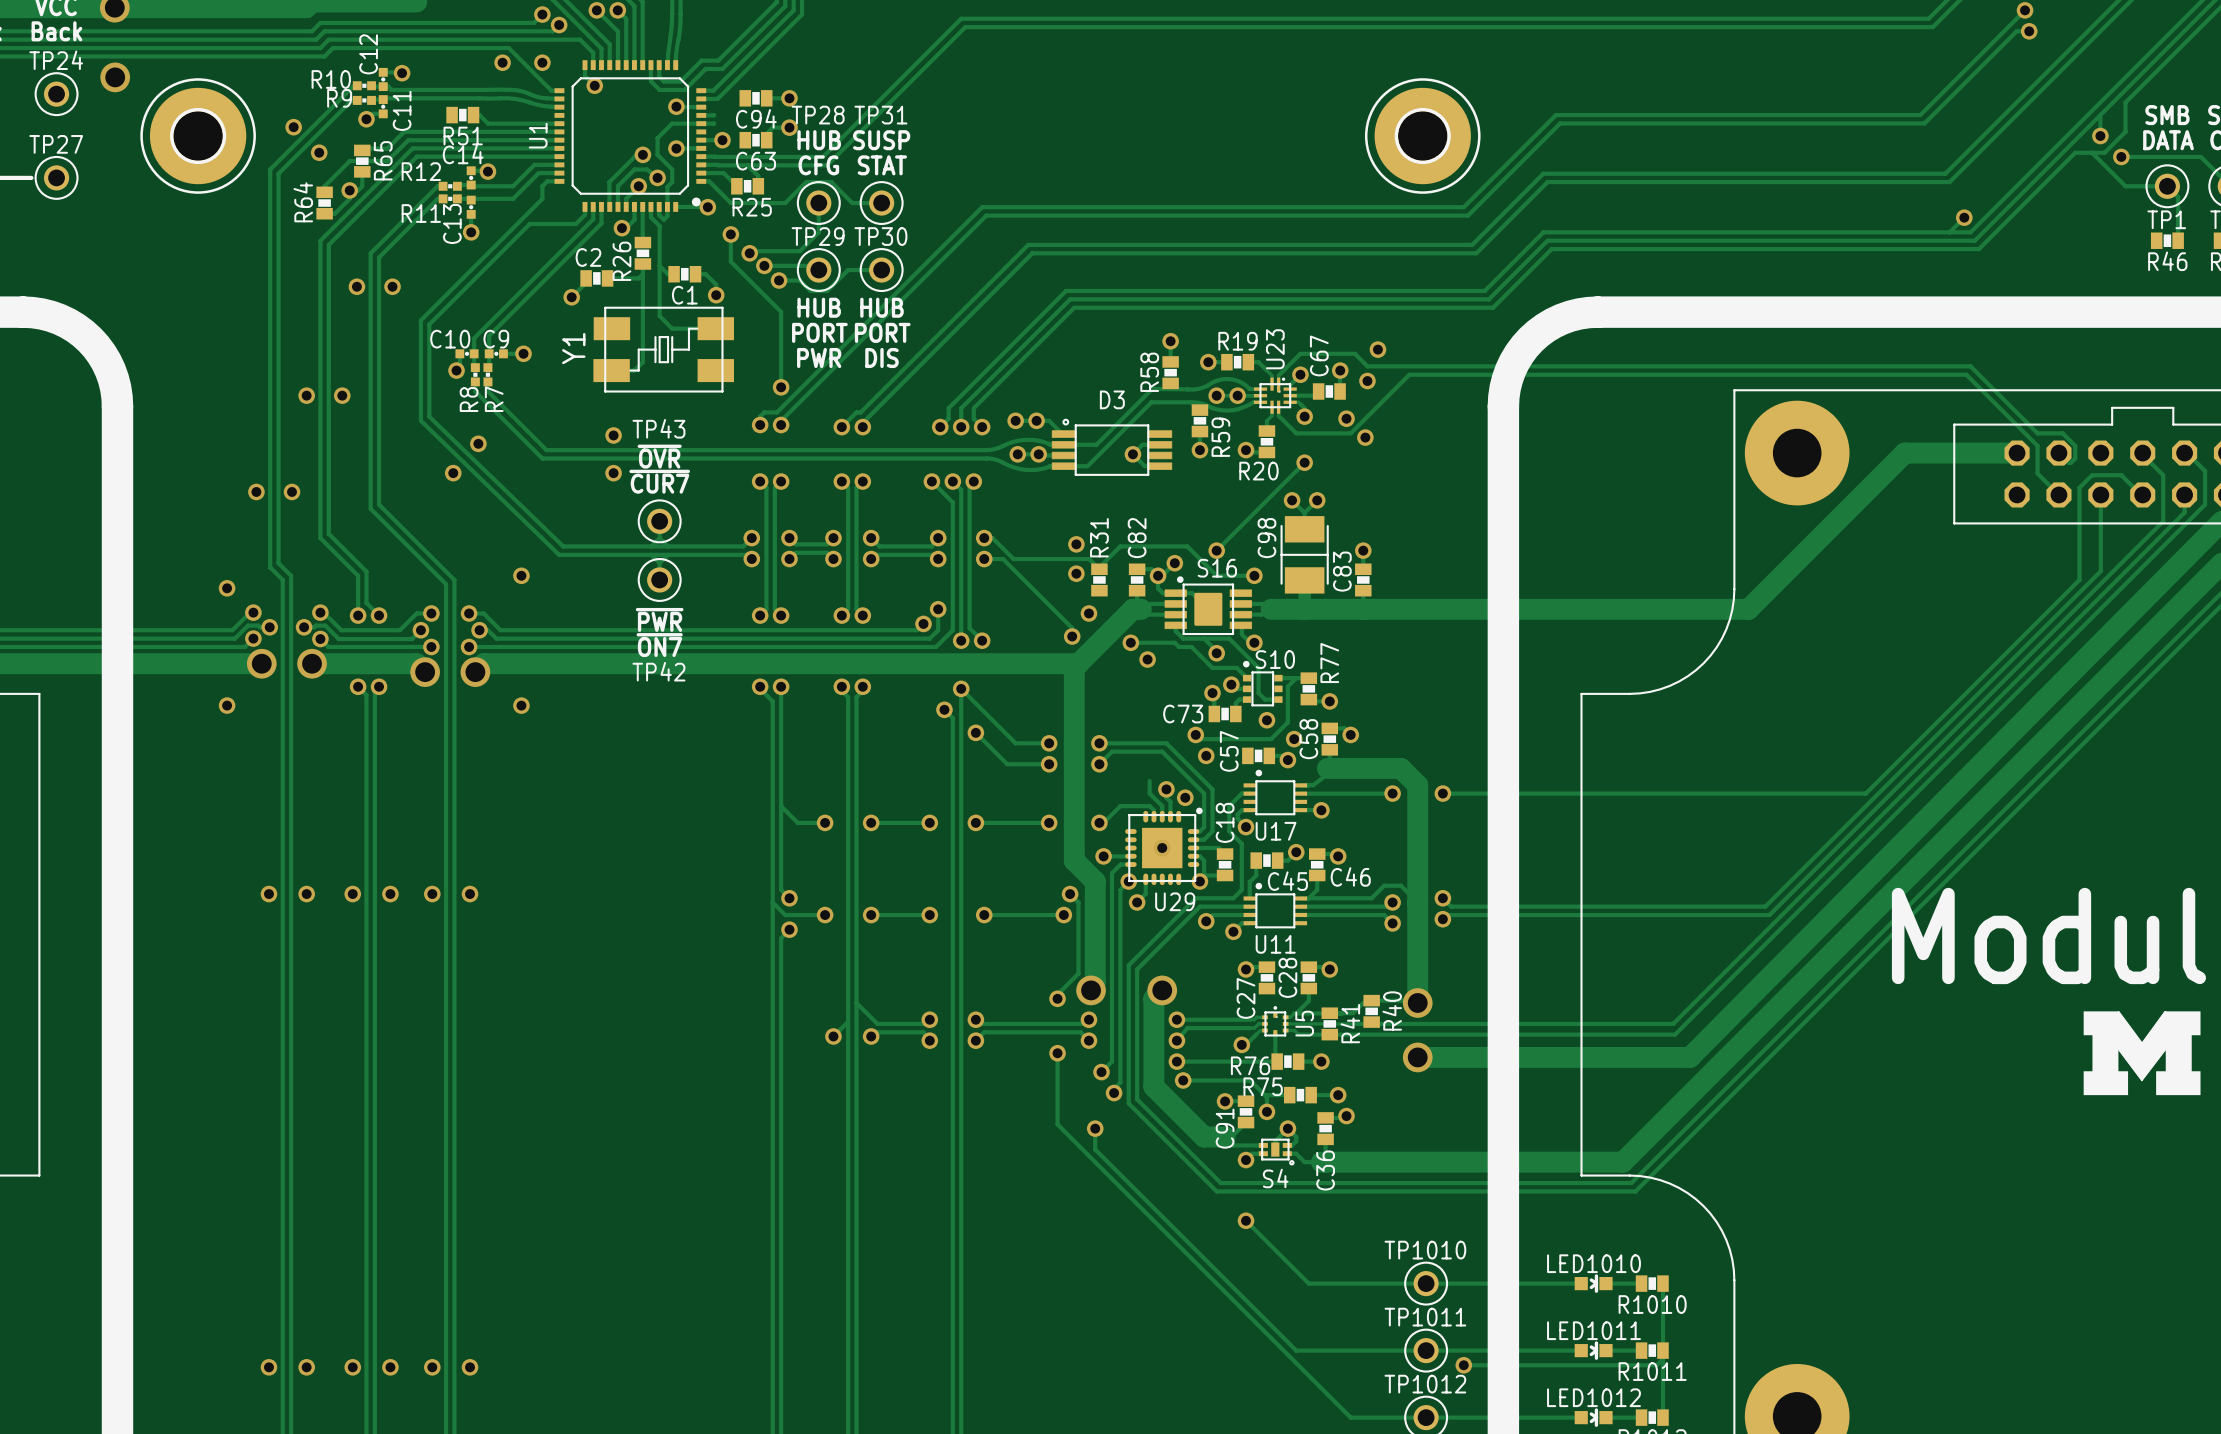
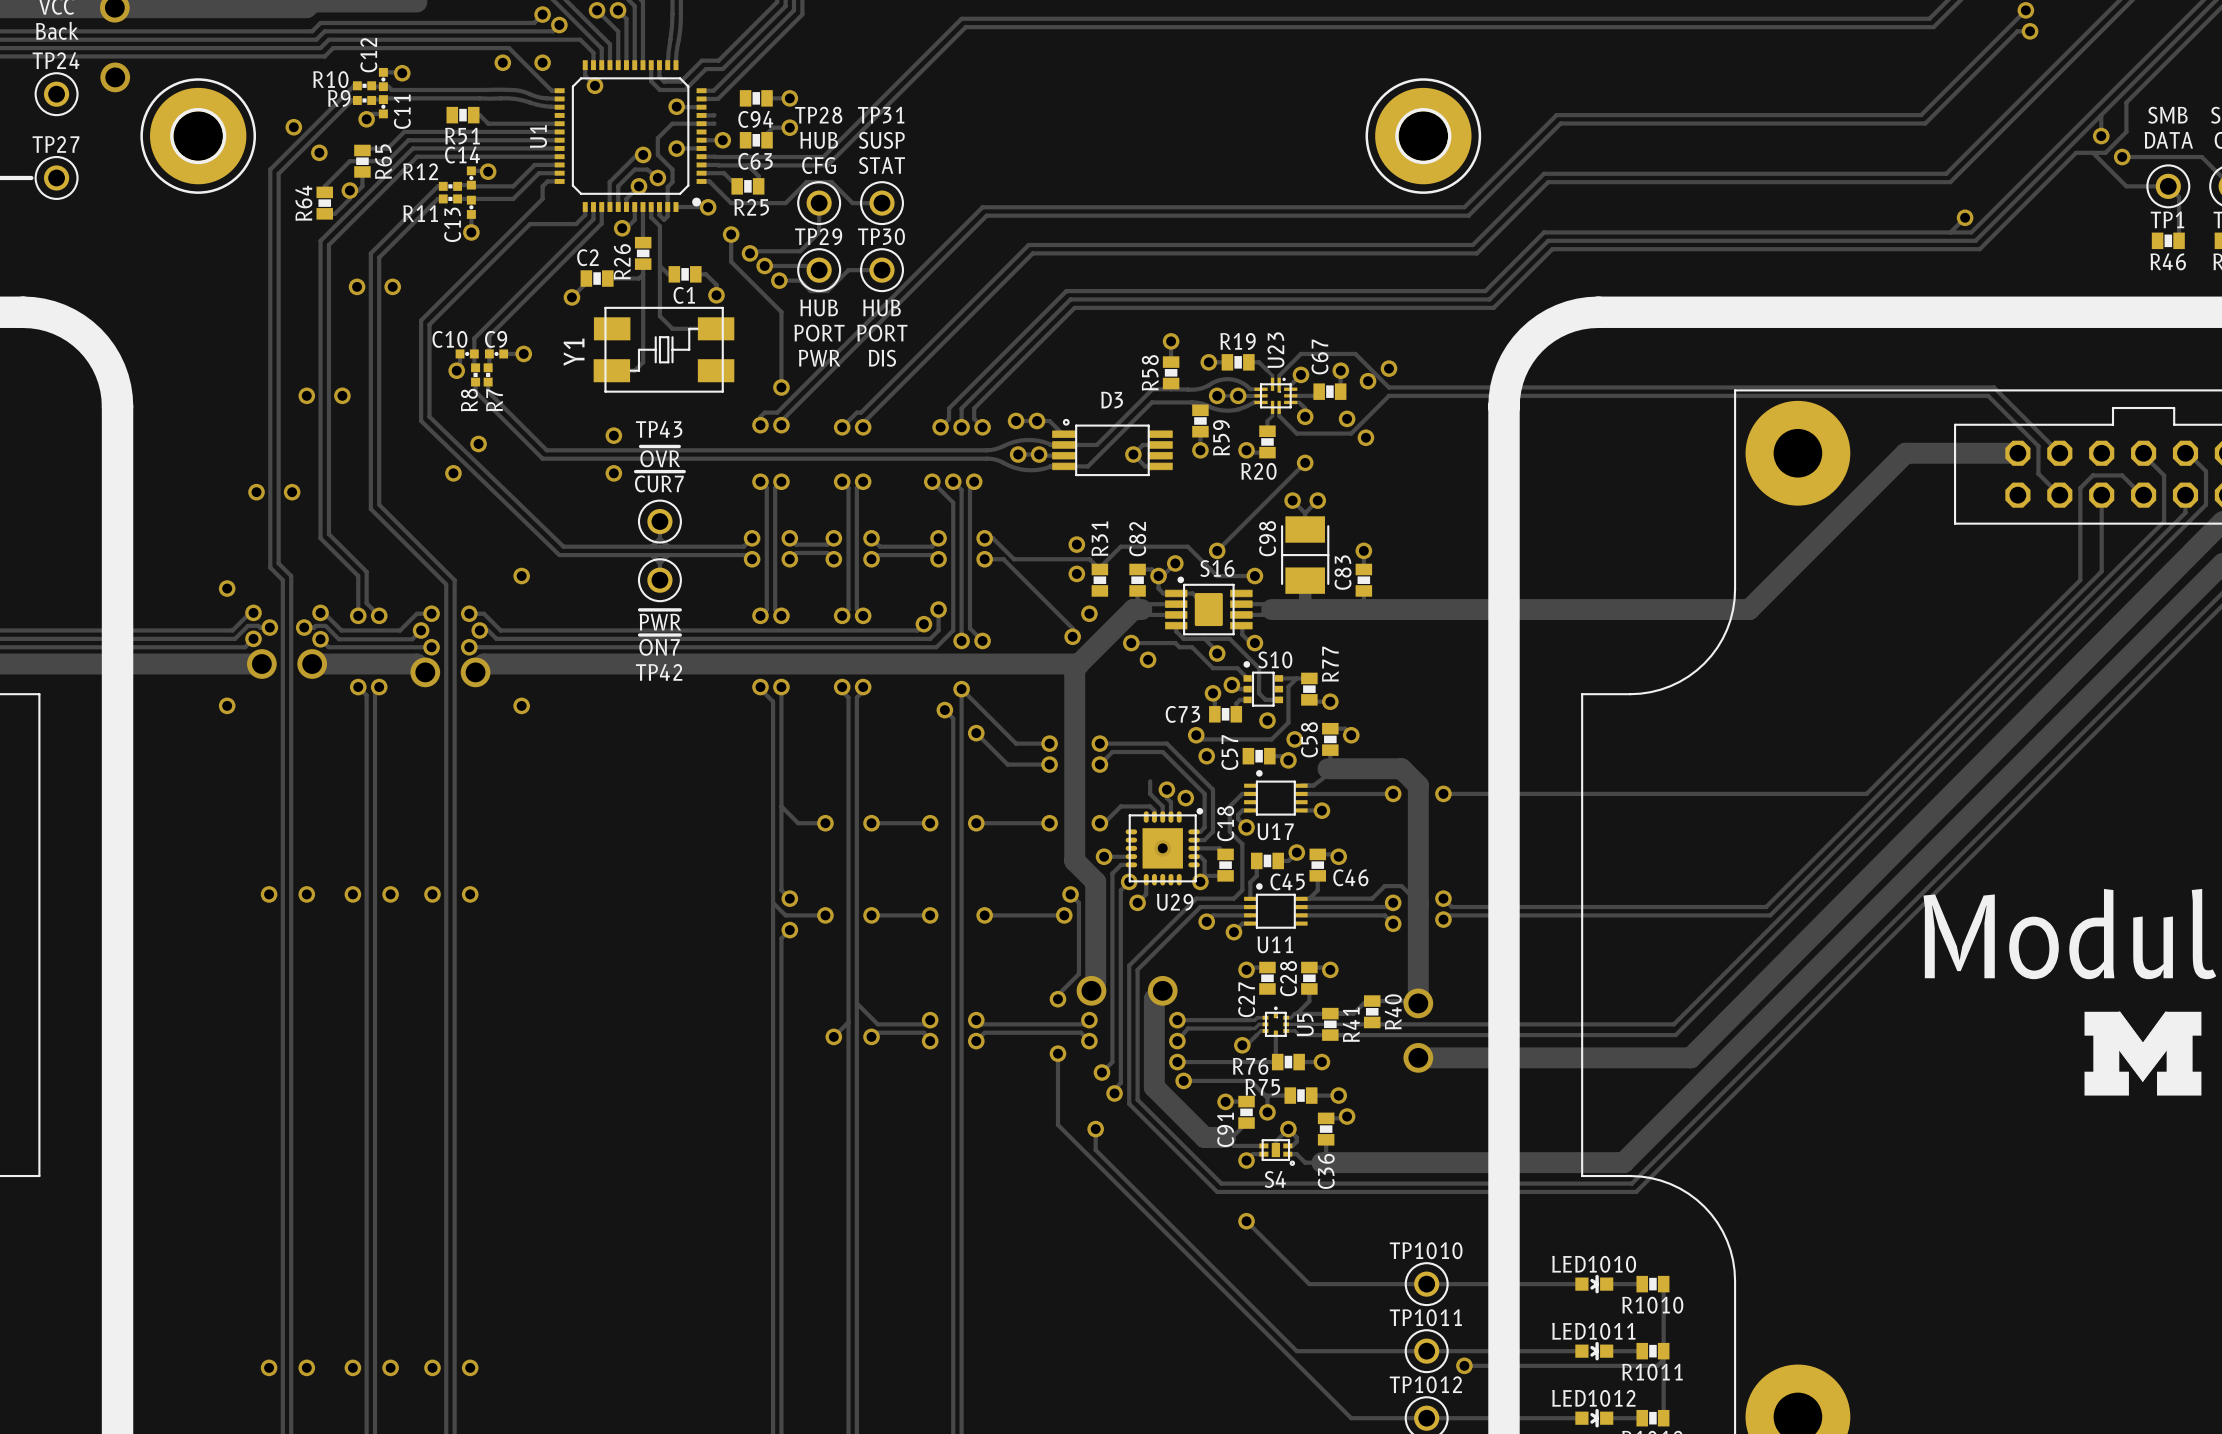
via position: (1377, 349) -> (1388, 368)
track: (1367, 366) (1970, 366) (2037, 433) (2062, 433) (2075, 445) (2075, 458) (2071, 462) (2068, 462) (2058, 453) -> (1368, 366) (1388, 387) (1994, 387) (2059, 453)
track: (1388, 395) (1409, 374) (1966, 374) (1987, 395) -> (1388, 395) (1988, 395)

